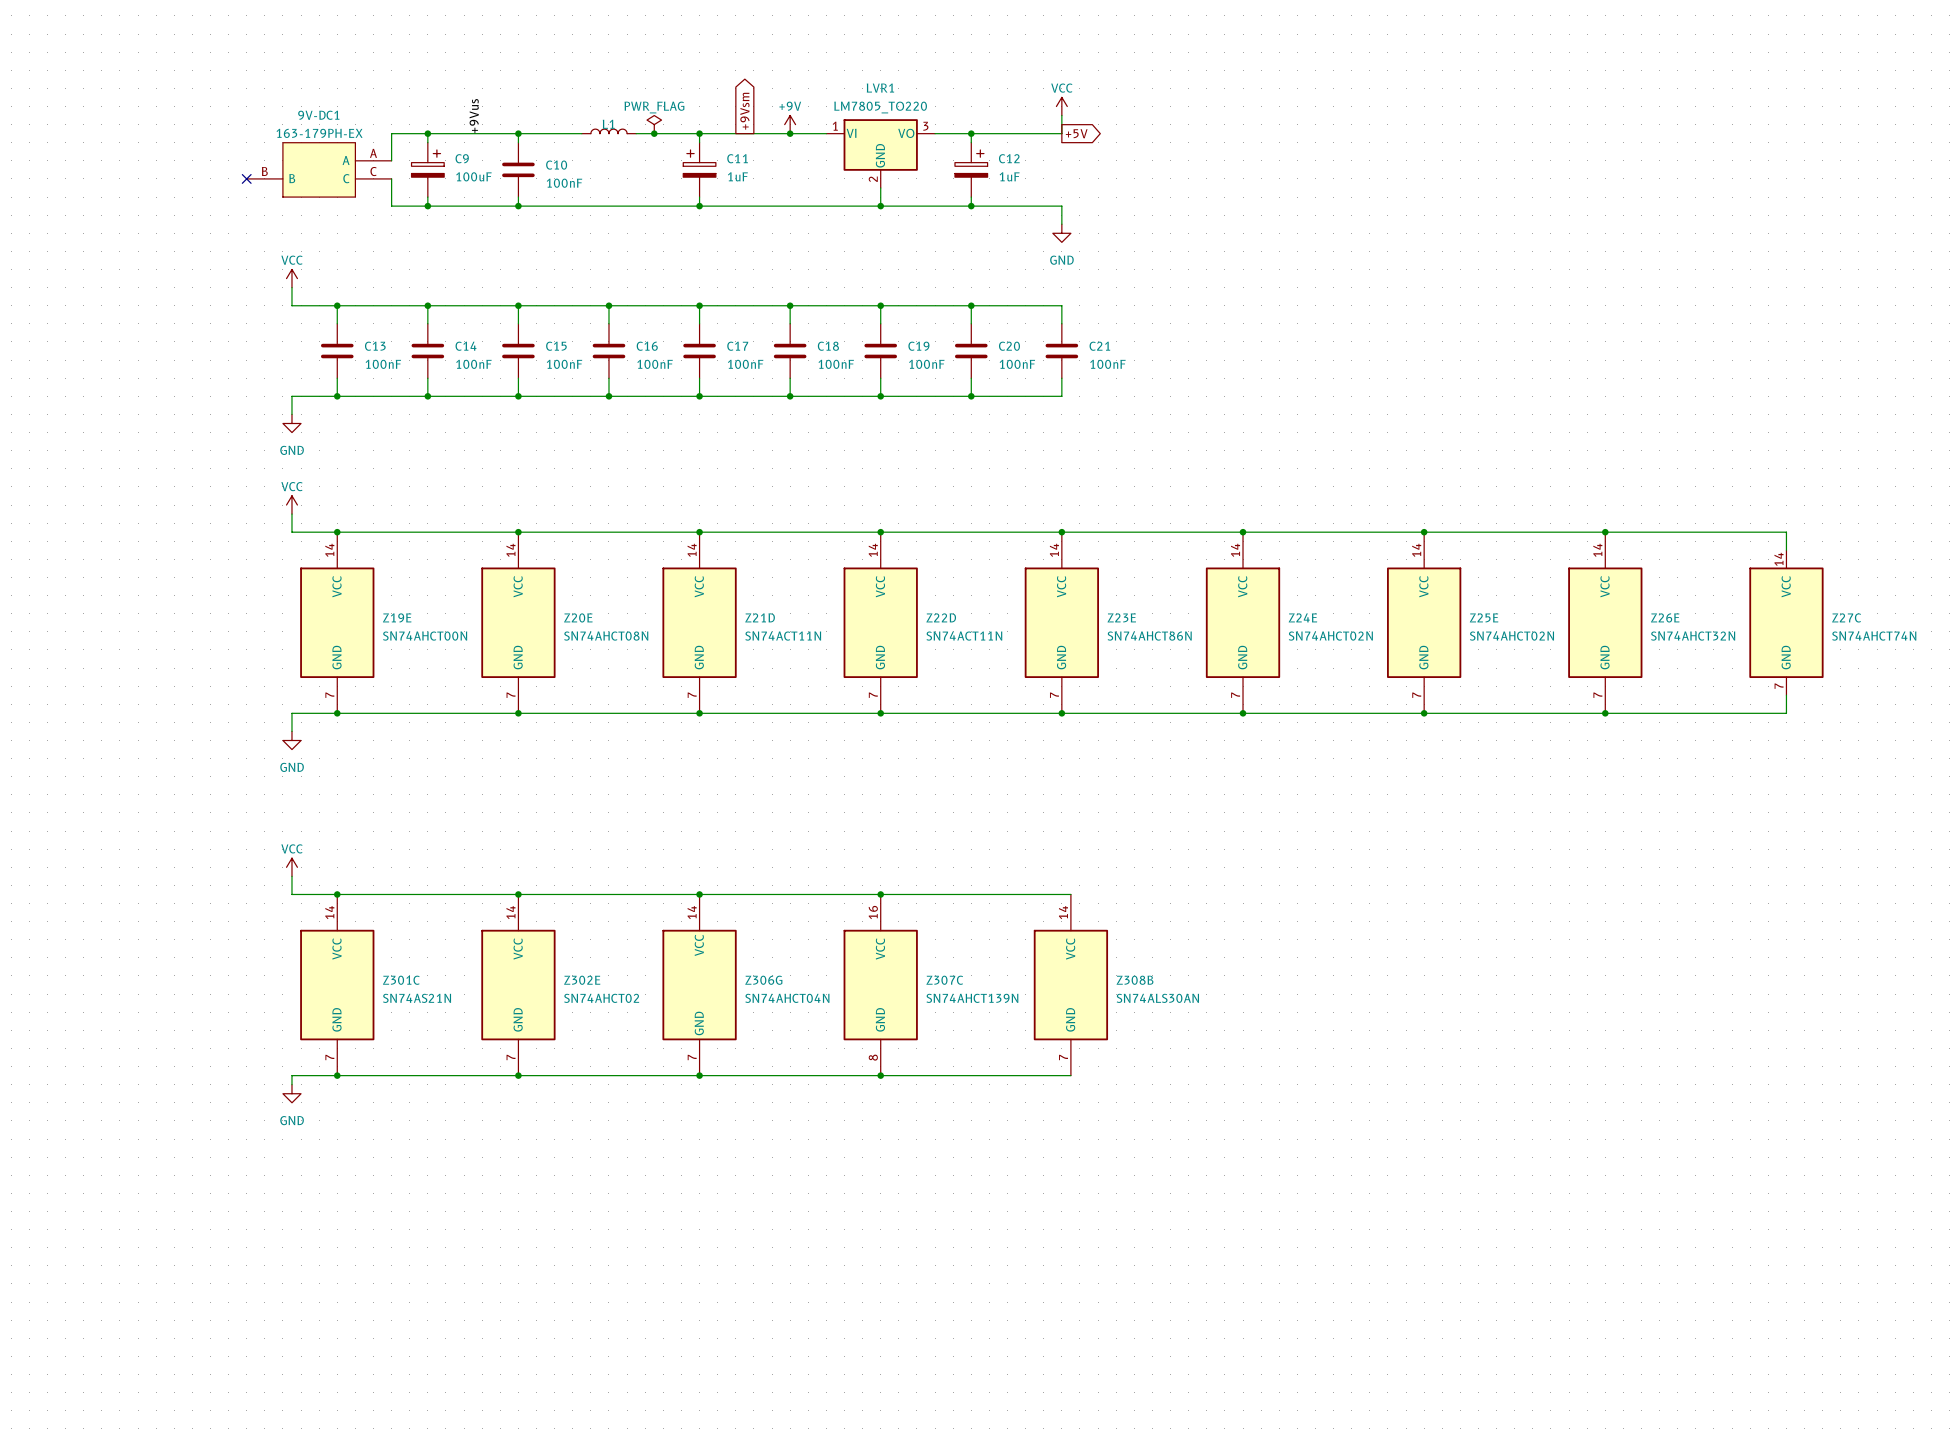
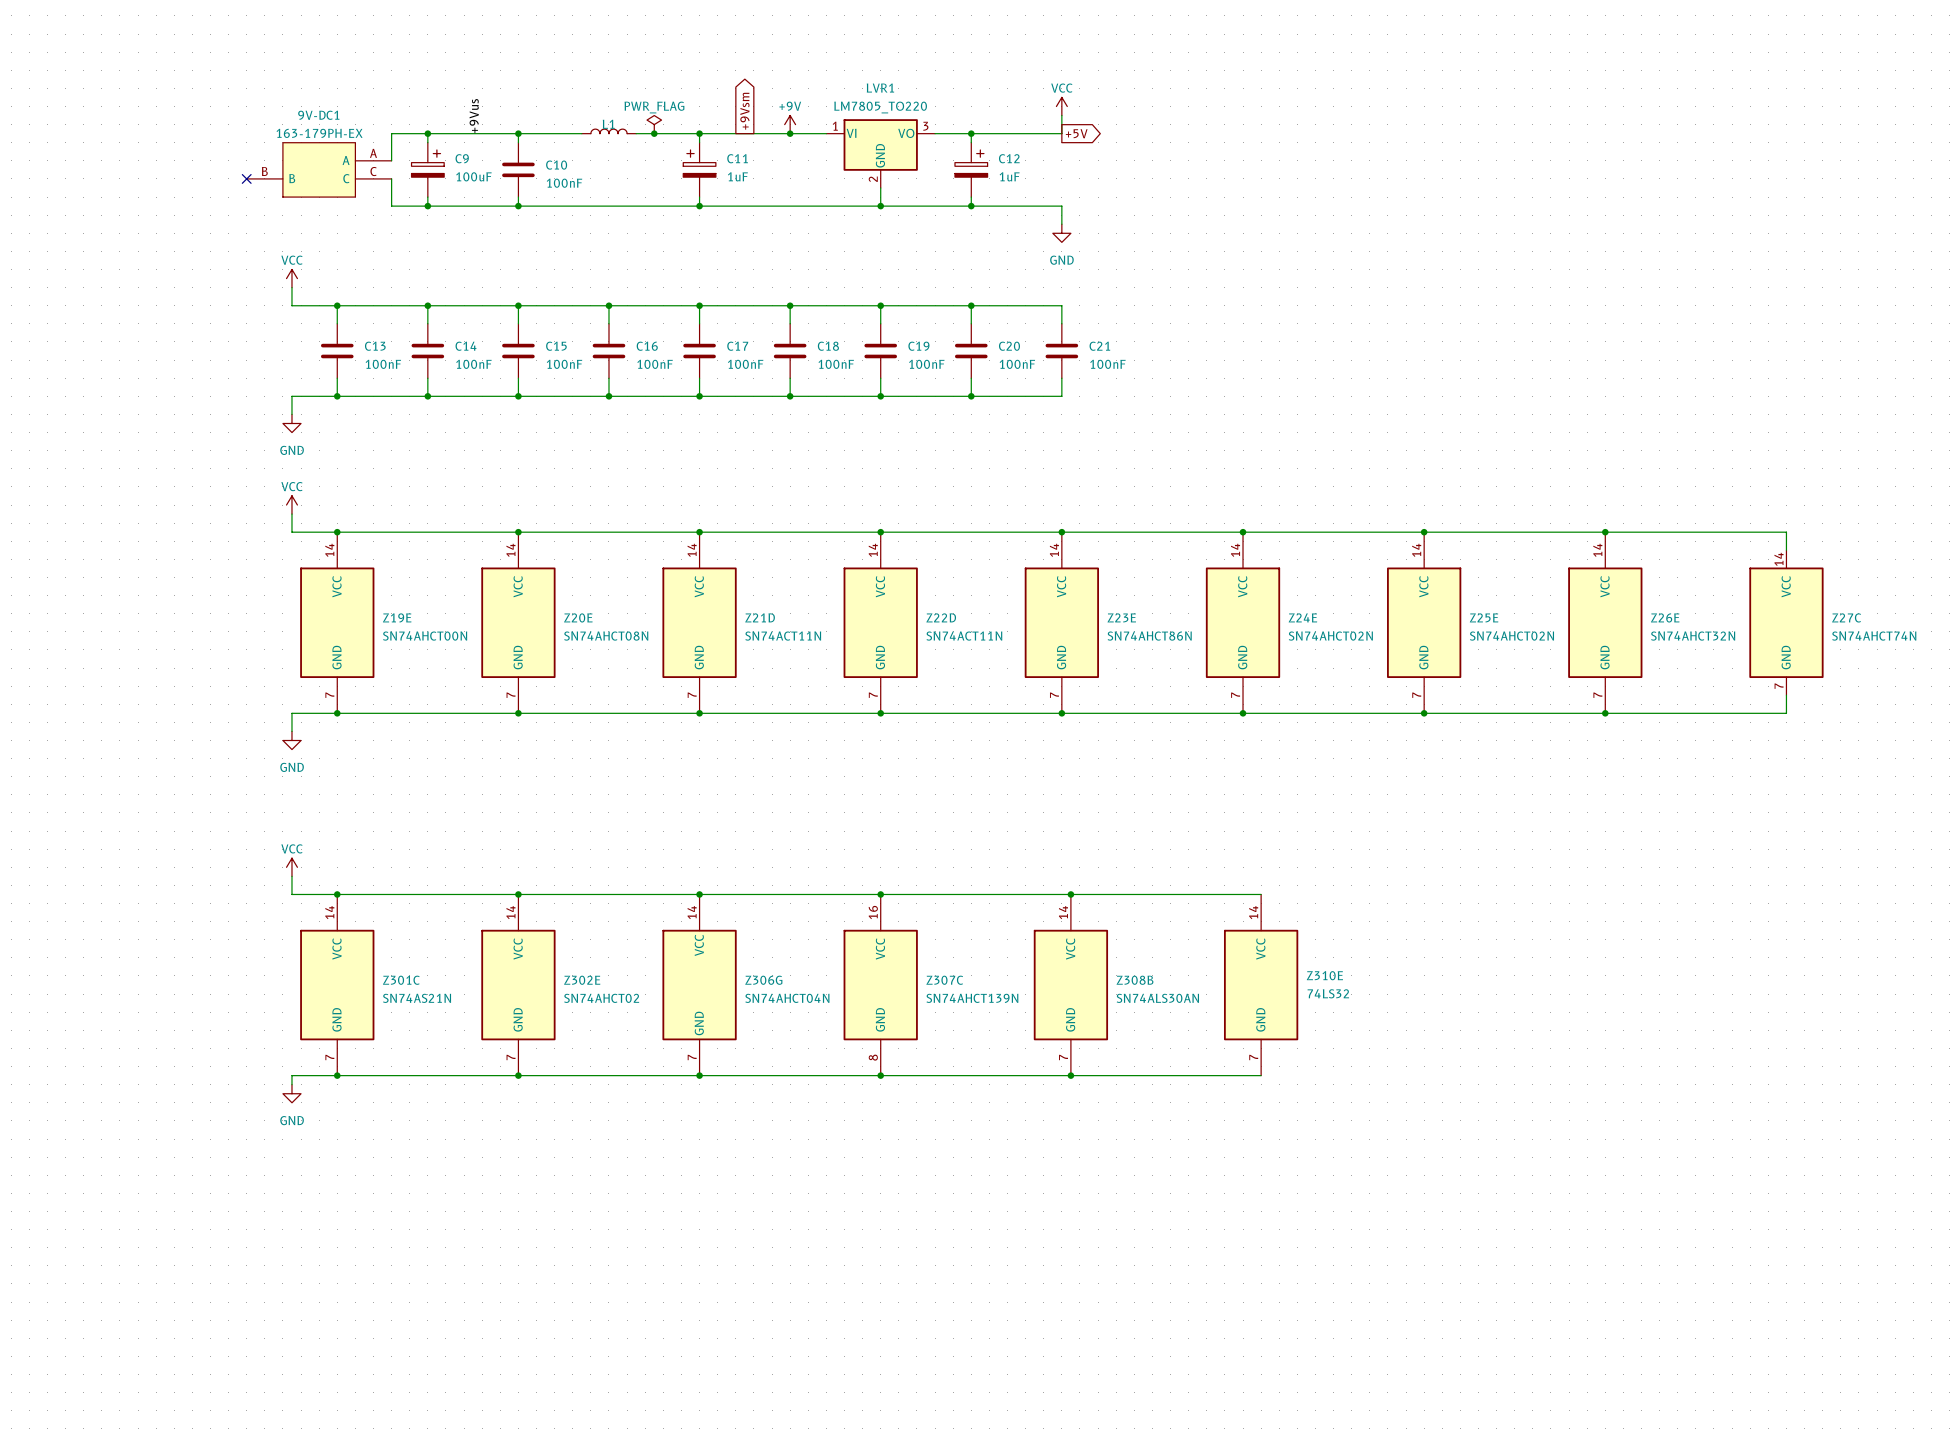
wire: none -> (1070, 894) (1261, 894)
junction: none -> (1070, 894)
Z310E: none -> 74LS32 (1261, 985)
wire: none -> (1070, 1075) (1261, 1075)
junction: none -> (1070, 1075)

